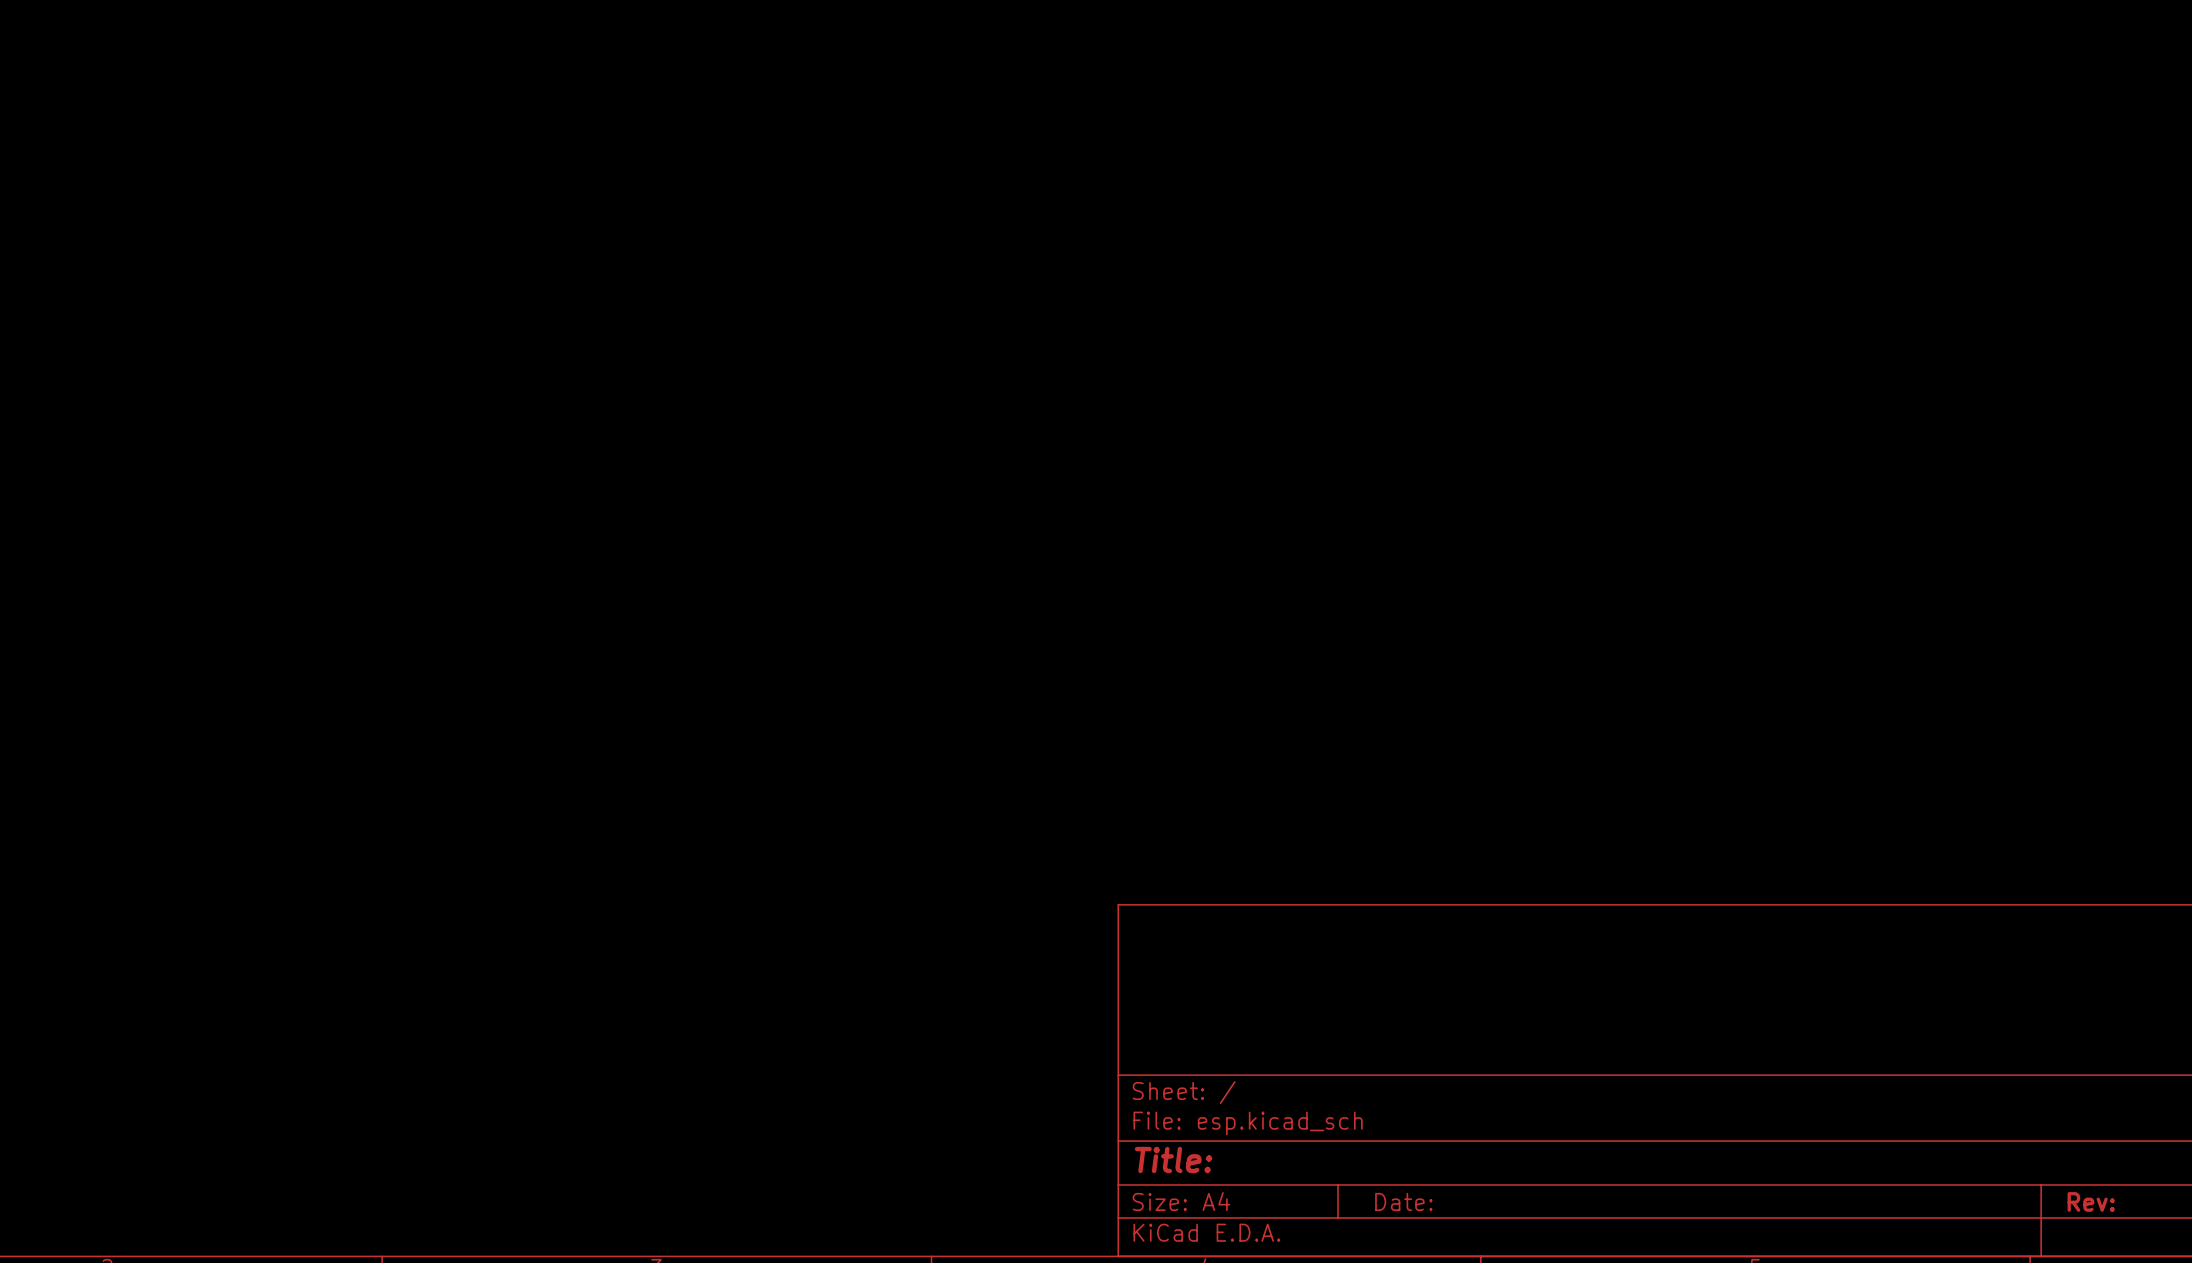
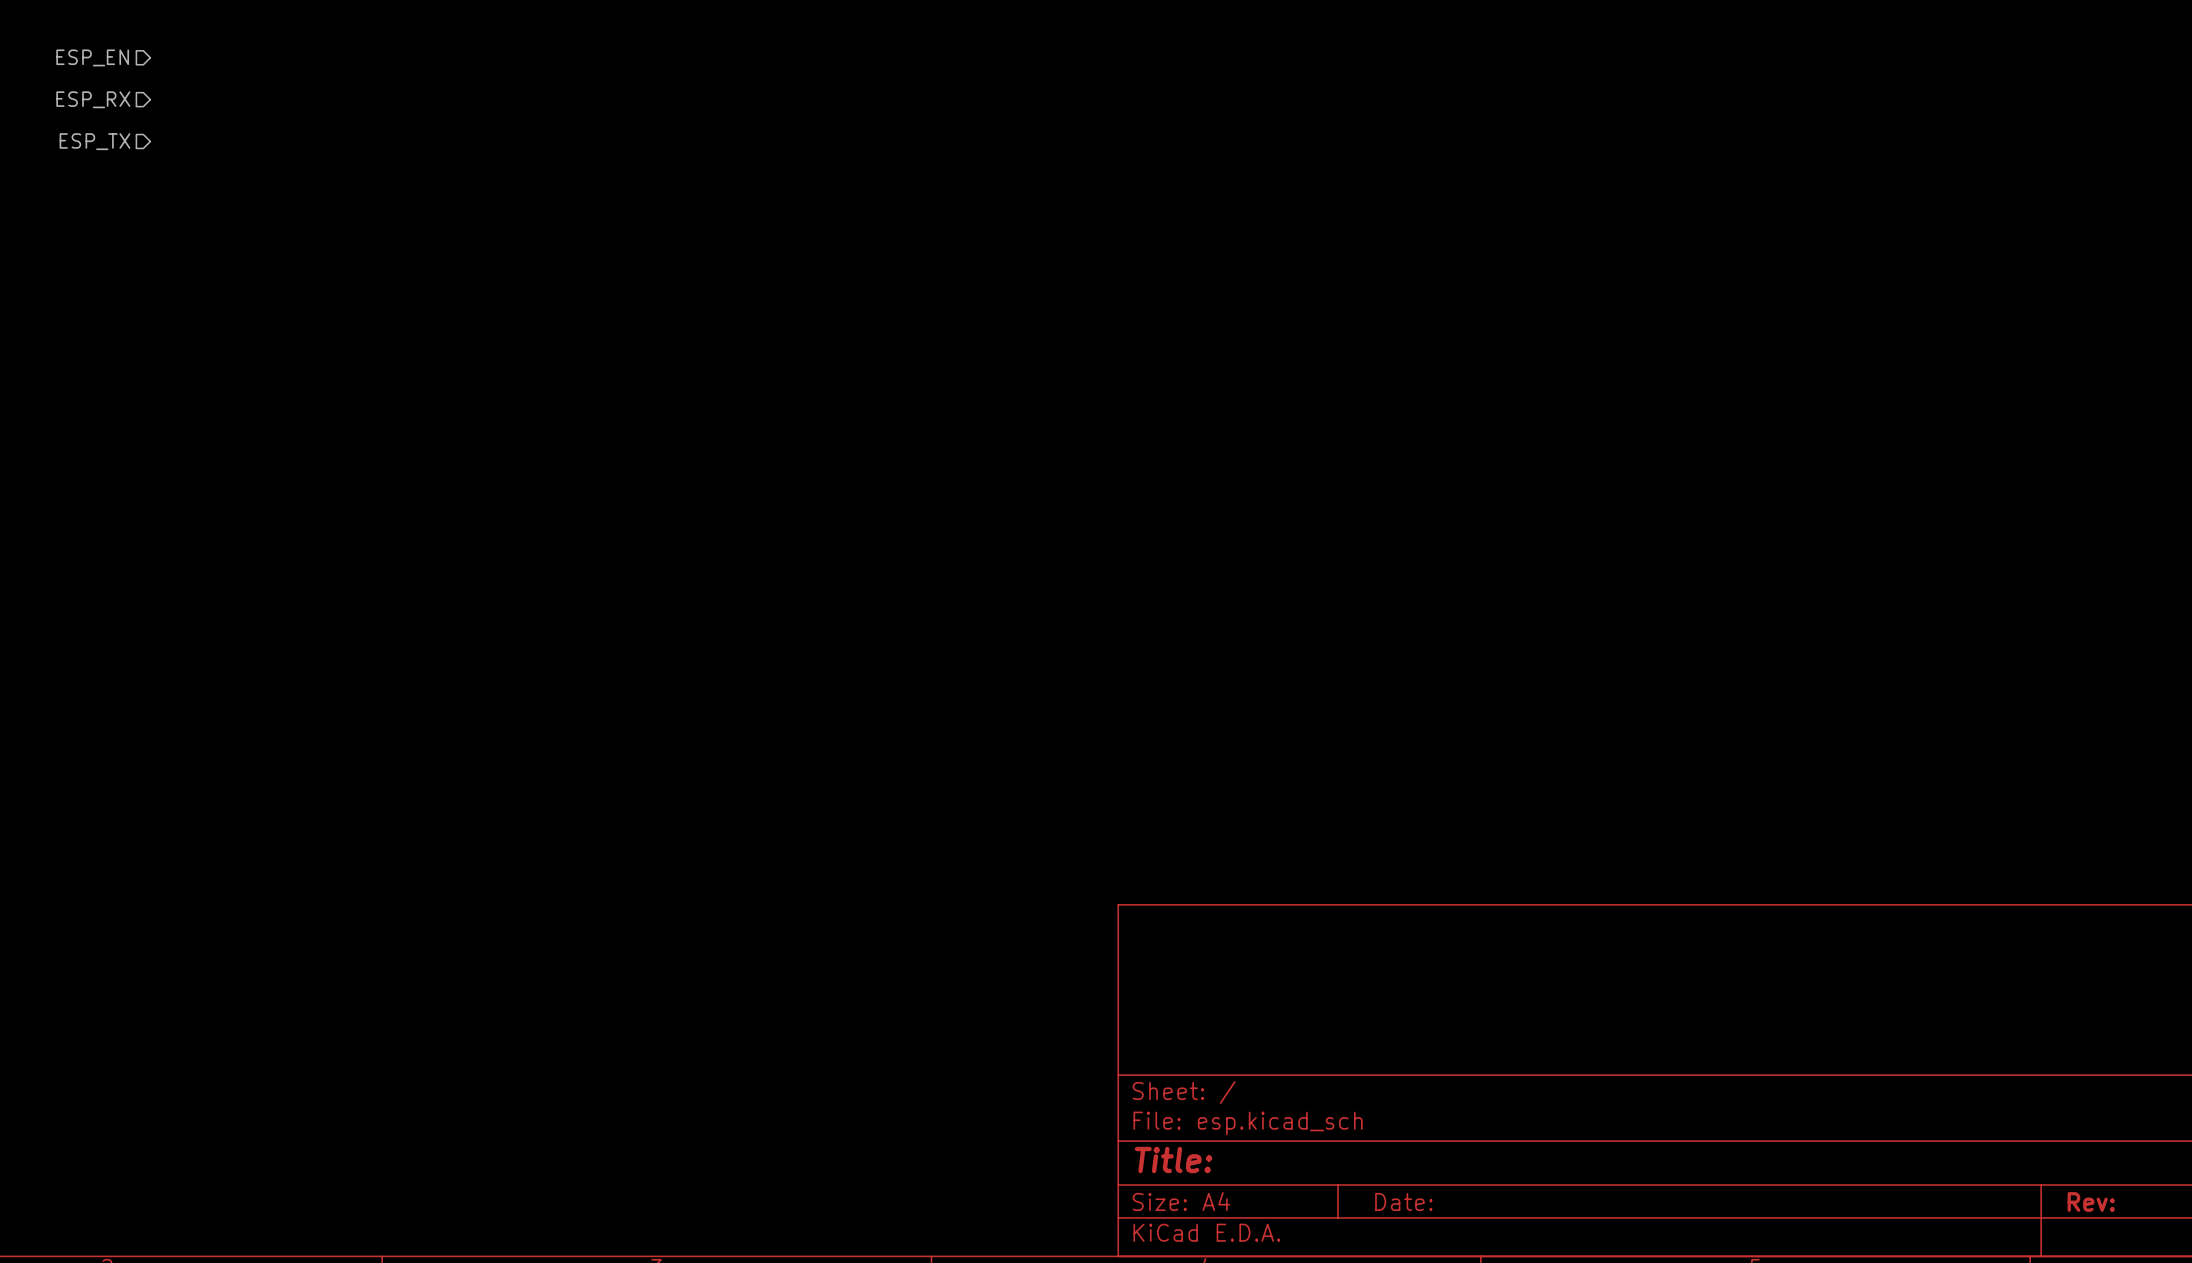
hierarchical label: none -> ESP_EN (92, 57)
hierarchical label: none -> ESP_RX (93, 99)
hierarchical label: none -> ESP_TX (94, 141)

